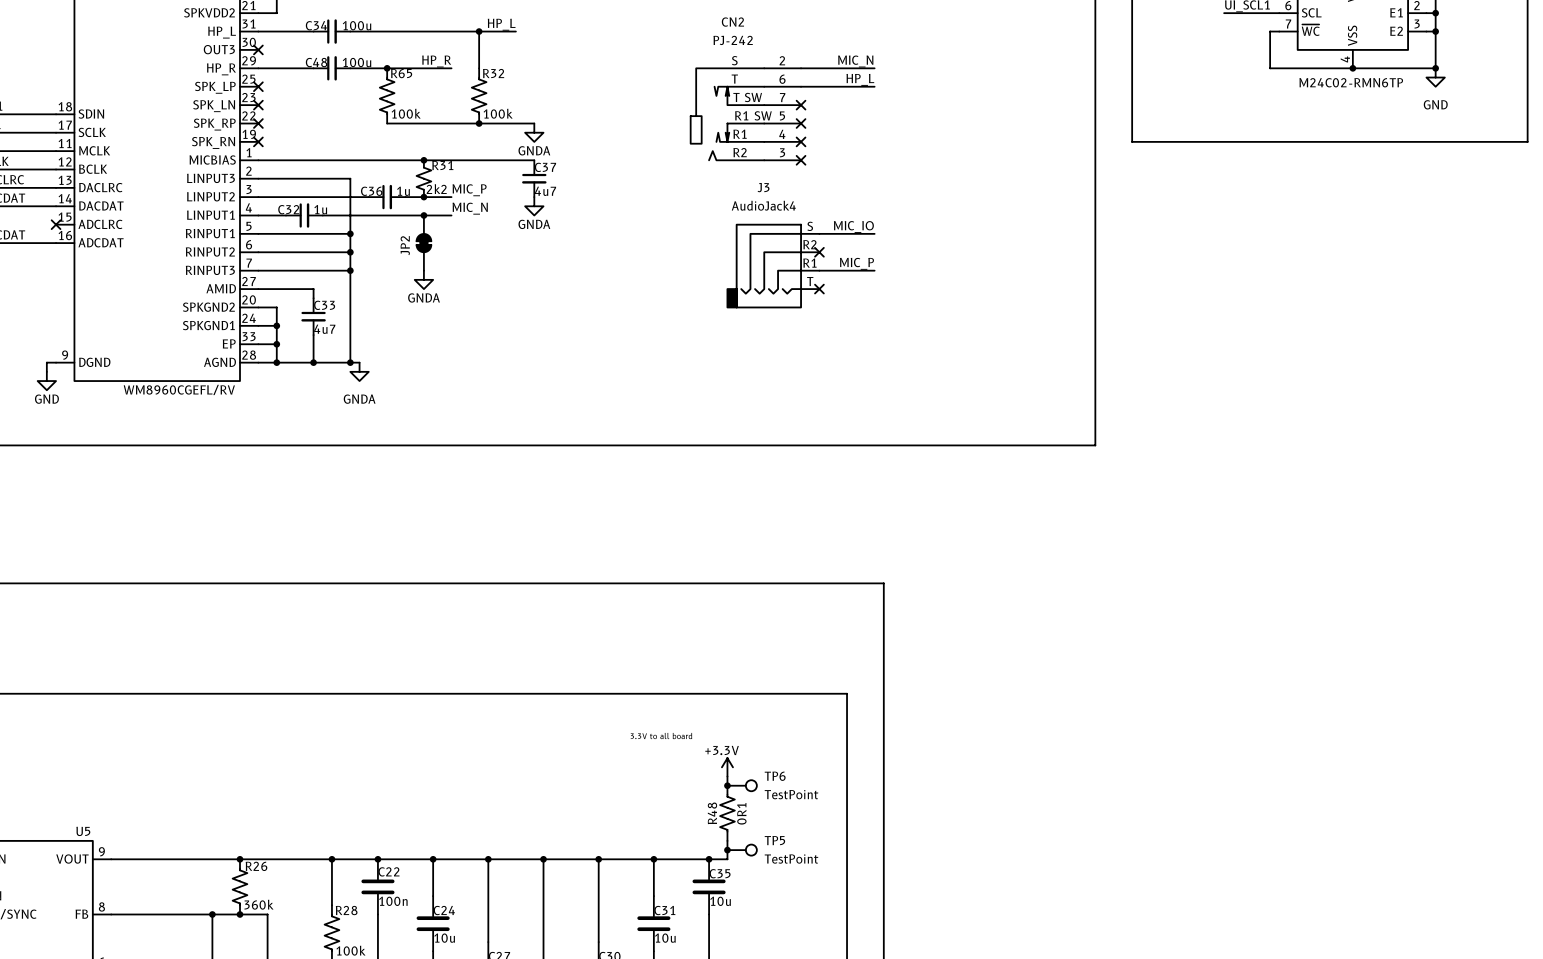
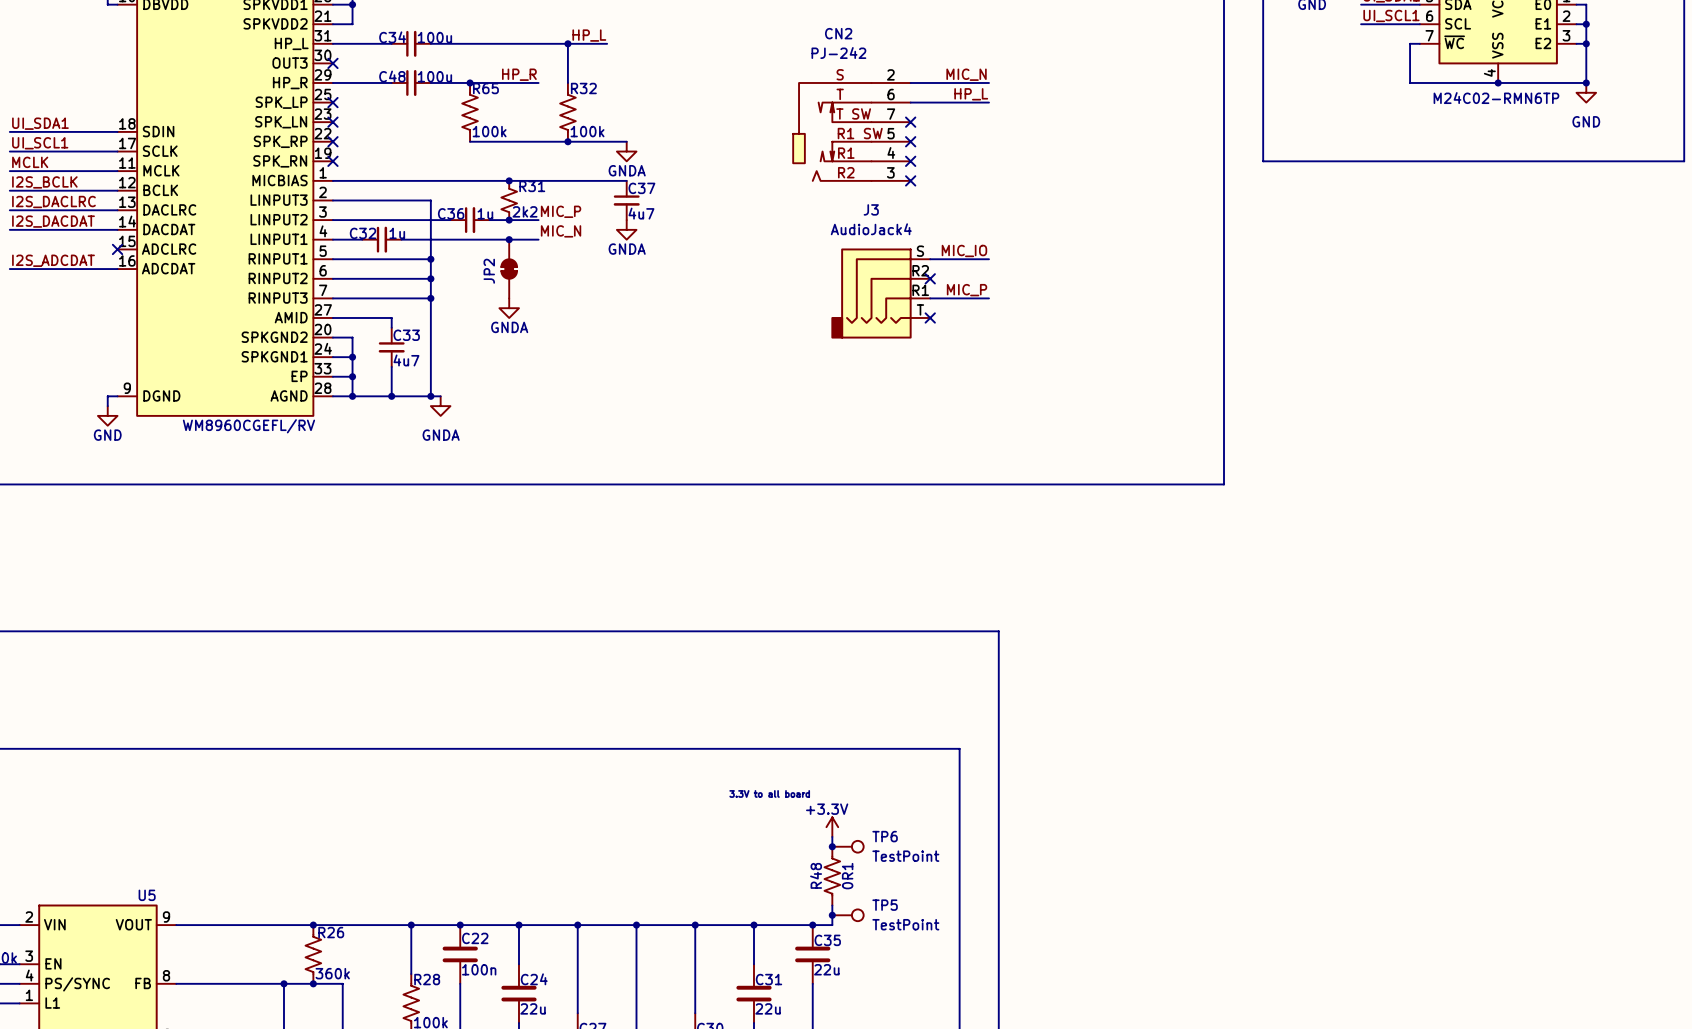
C35 value: 10u (720, 901) -> 22u (826, 969)
C24 value: 10u (444, 938) -> 22u (533, 1008)
C31 value: 10u (665, 938) -> 22u (768, 1008)

